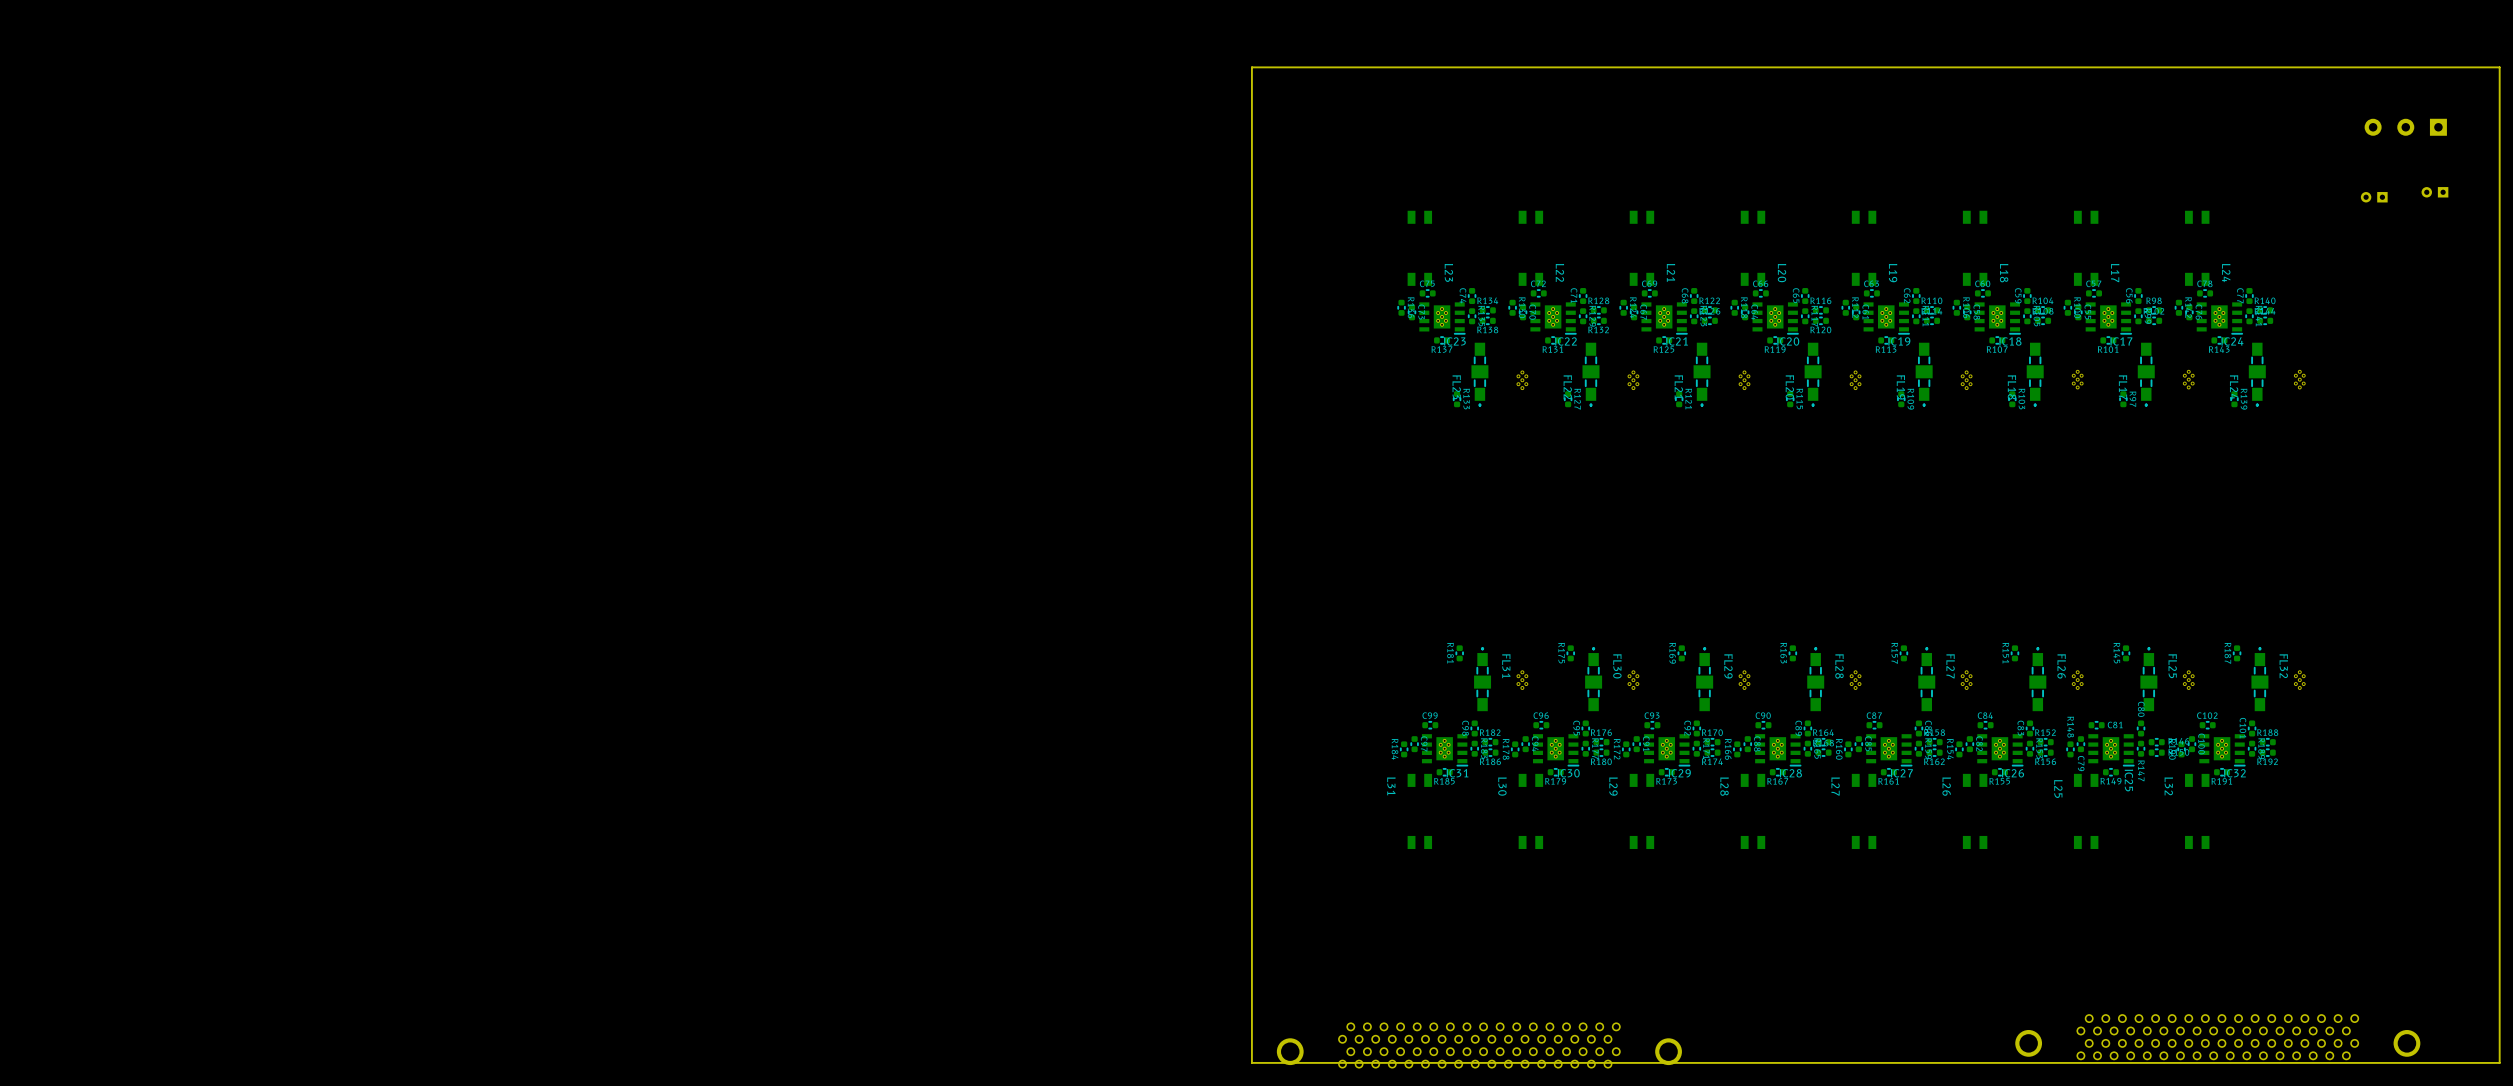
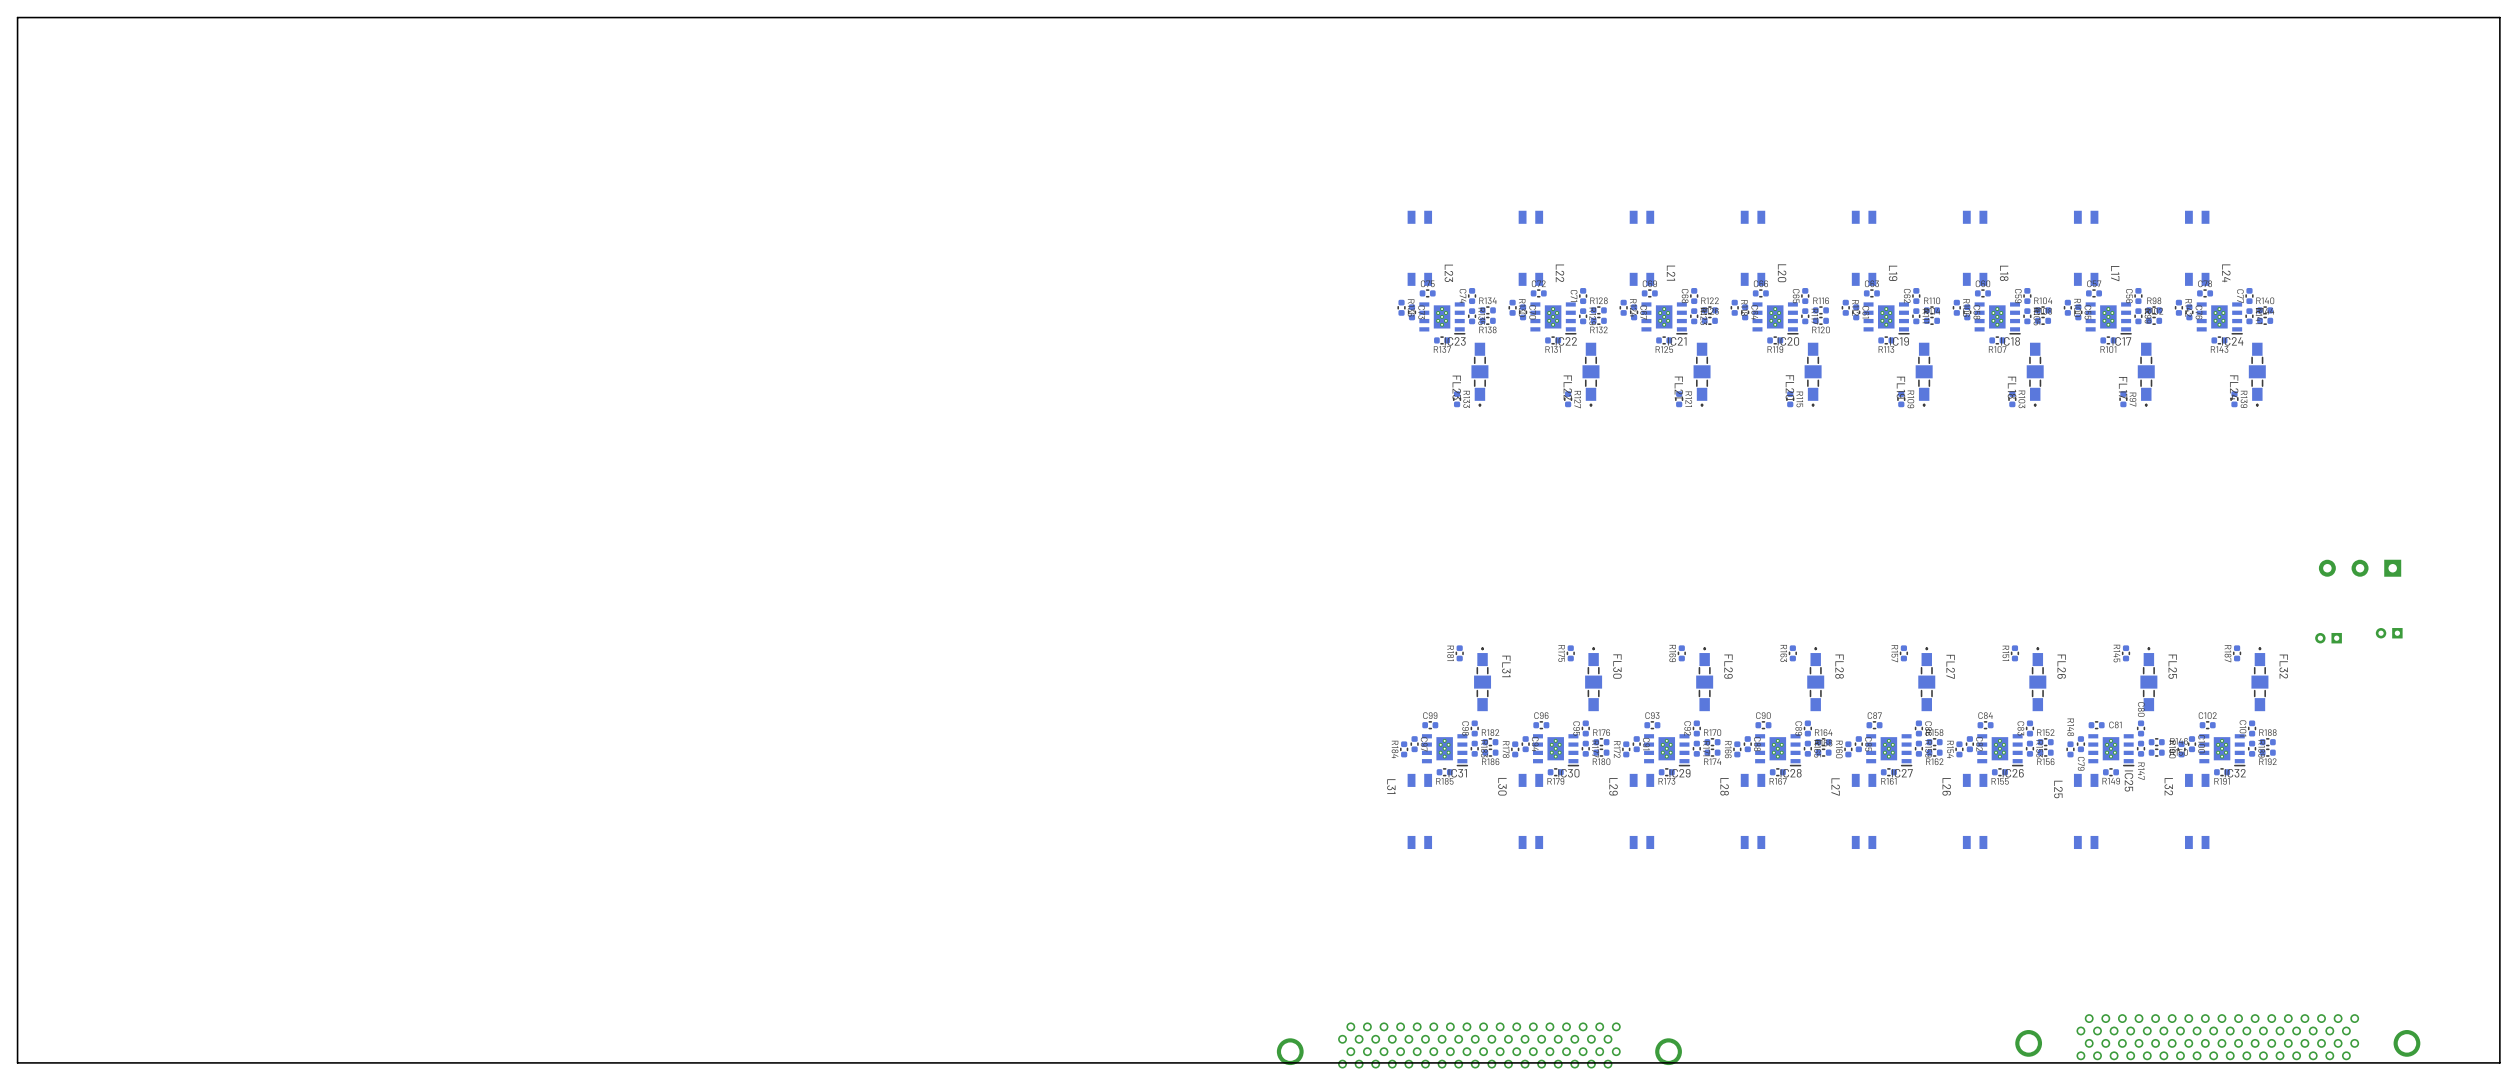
part: (2405, 127) -> none
part: (2434, 192) -> none
part: (2374, 197) -> none
part: (2077, 379) -> none
part: (2188, 379) -> none
part: (2299, 379) -> none
part: (1522, 380) -> none
part: (1633, 380) -> none
part: (1744, 380) -> none
part: (1855, 380) -> none
part: (1966, 380) -> none
part: none -> (2360, 568)
part: none -> (2389, 633)
part: none -> (2328, 638)
part: (1522, 680) -> none
part: (1633, 680) -> none
part: (1744, 680) -> none
part: (1855, 680) -> none
part: (1966, 680) -> none
part: (2077, 680) -> none
part: (2188, 680) -> none
part: (2299, 680) -> none
board edge: (2499, 1062) (2499, 67) (1251, 67) (1251, 1062) -> (2499, 1062) (2499, 17) (17, 17) (17, 1062) (1251, 1062)

